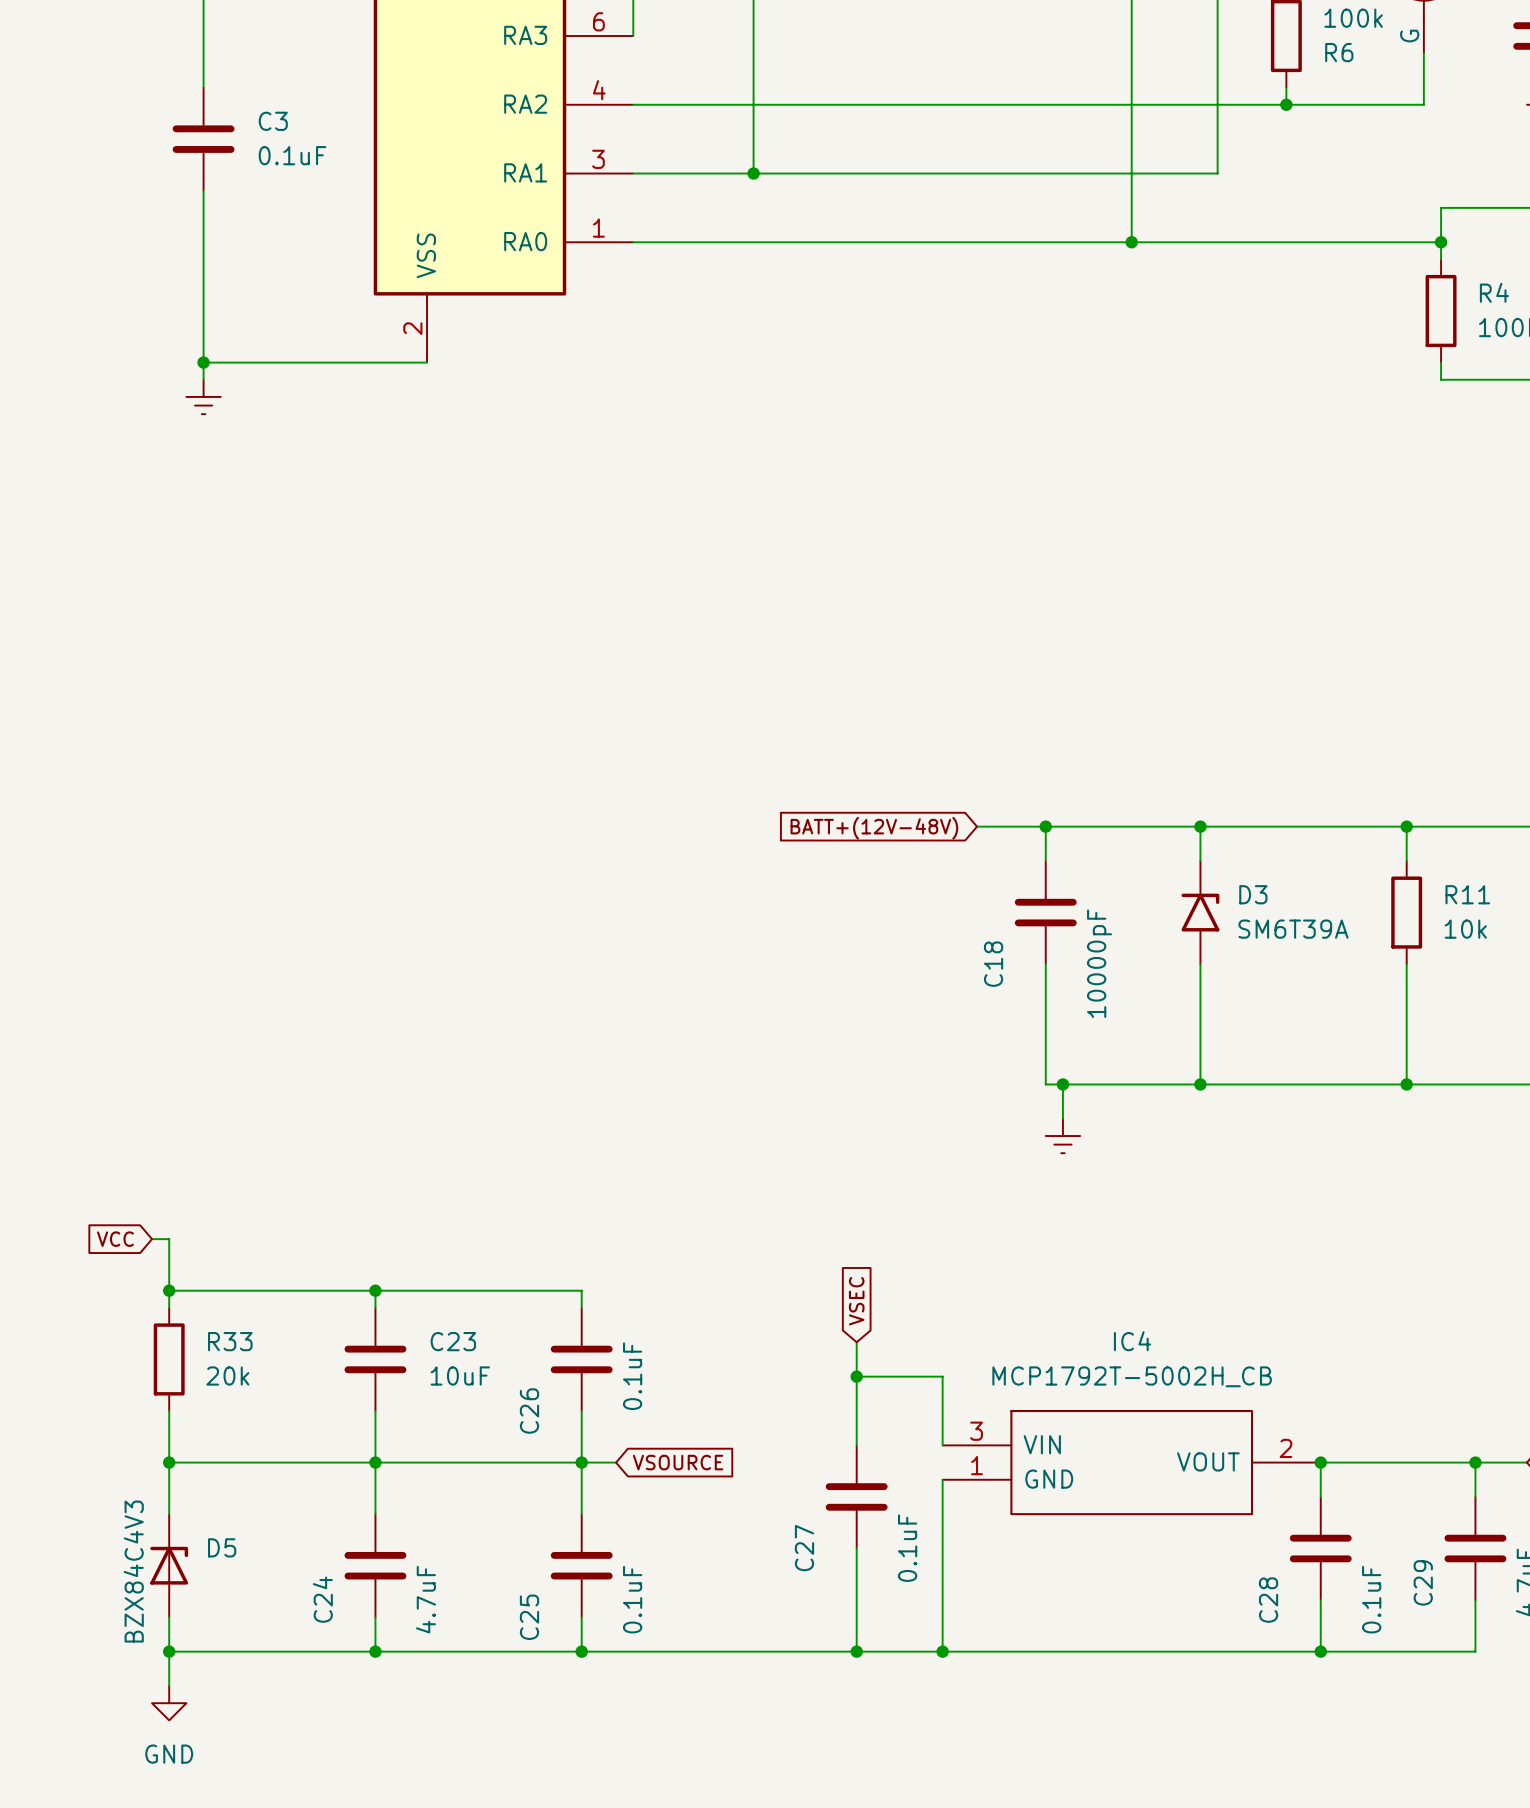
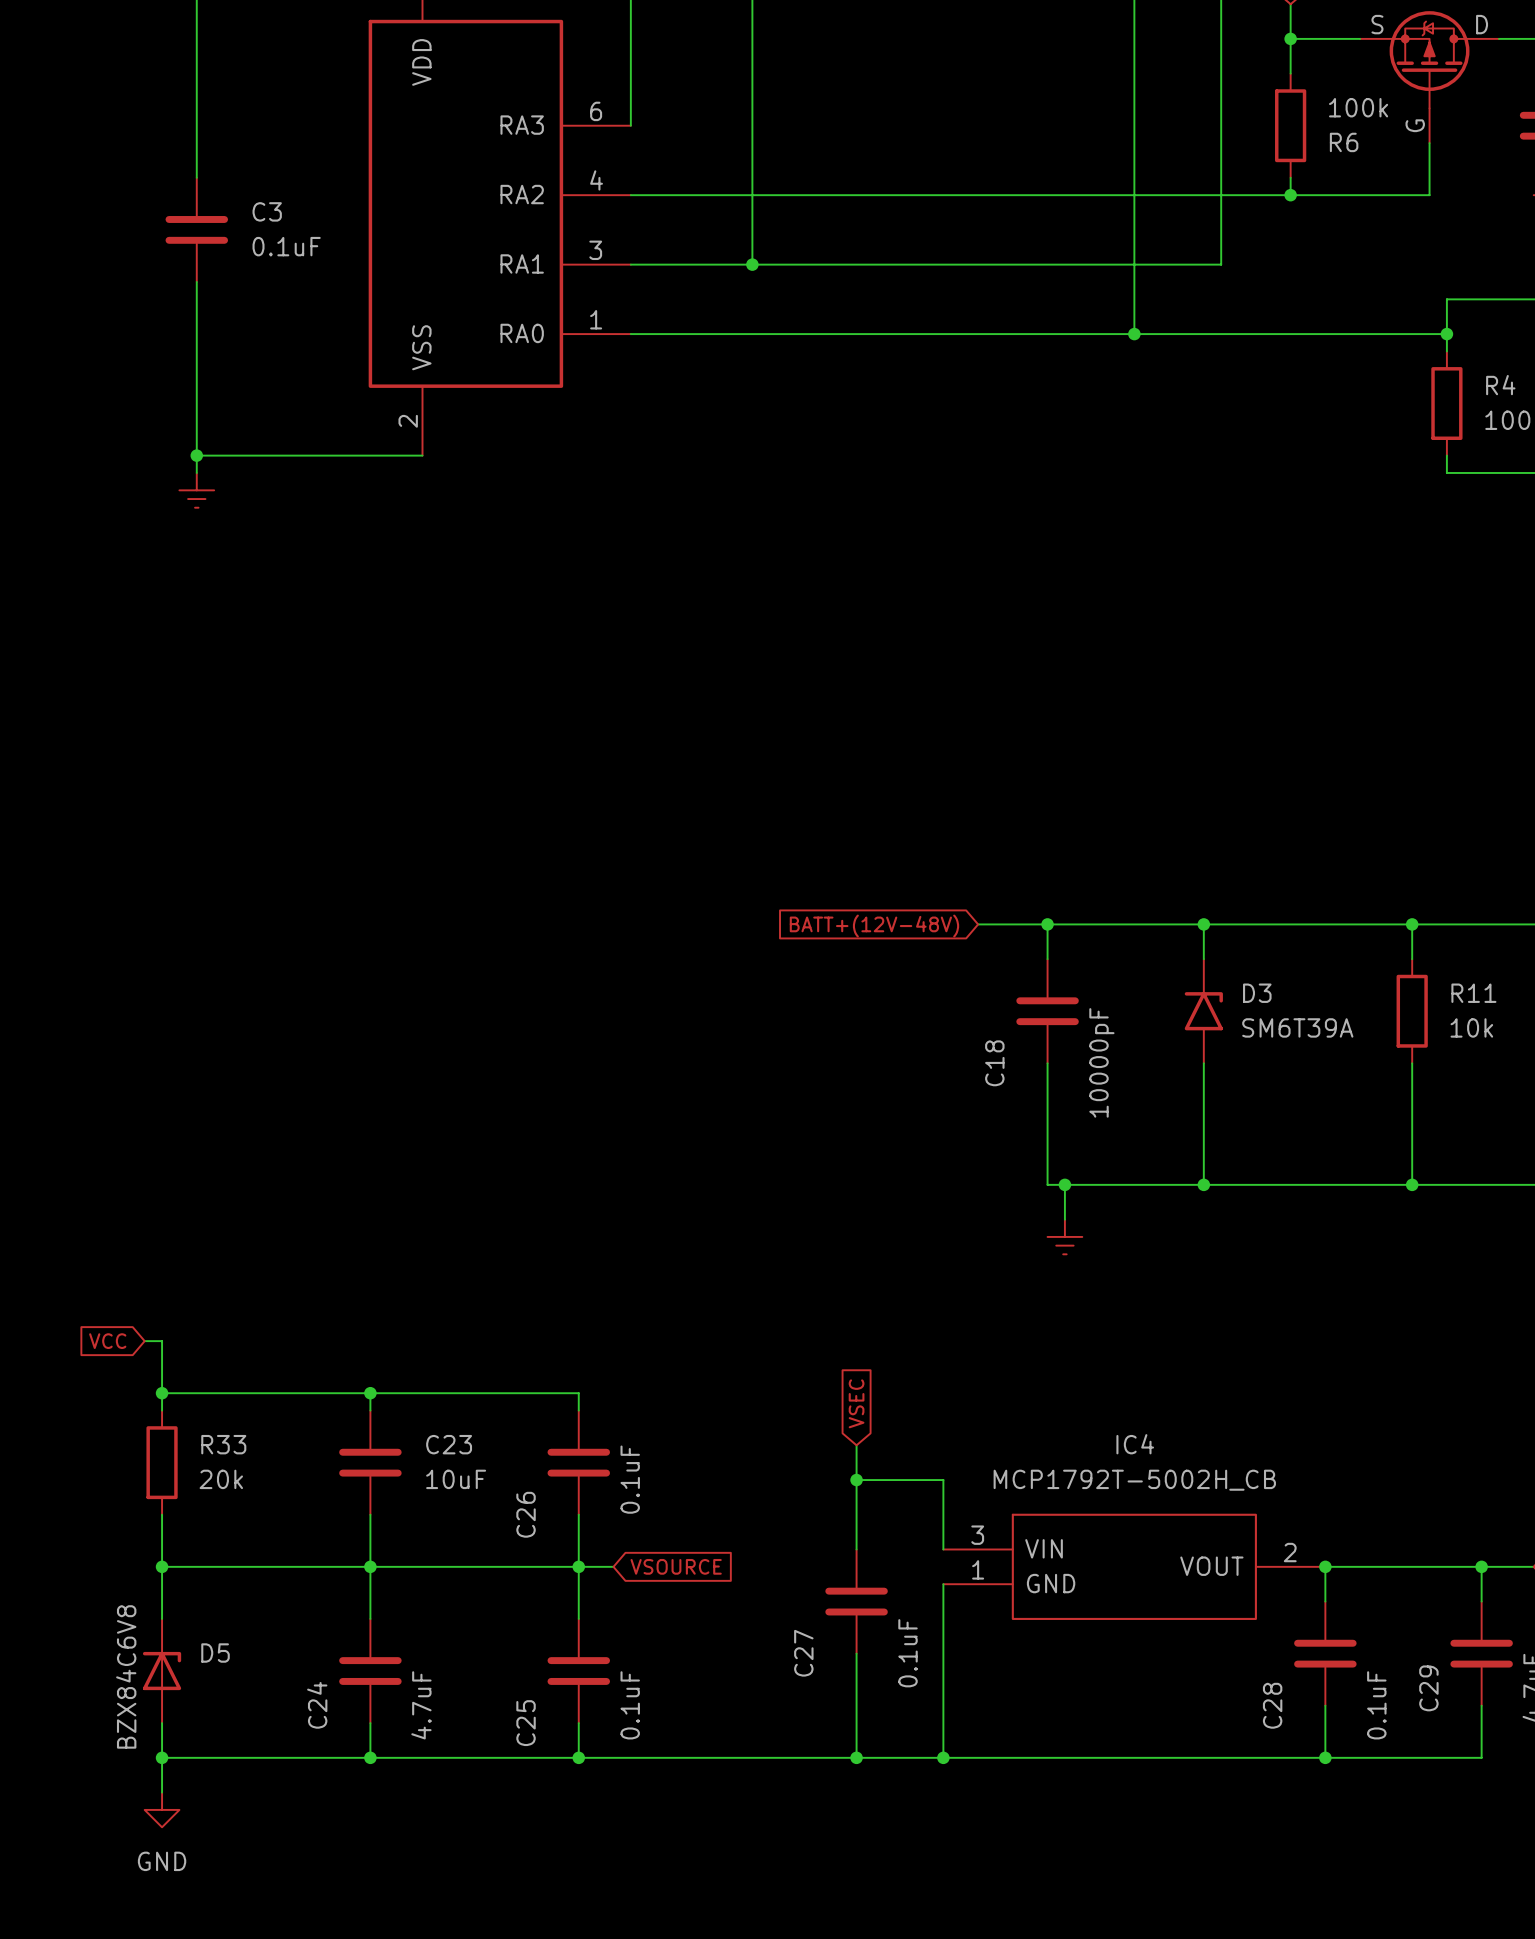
D5 value: BZX84C4V3 (133, 1571) -> BZX84C6V8 (126, 1676)

